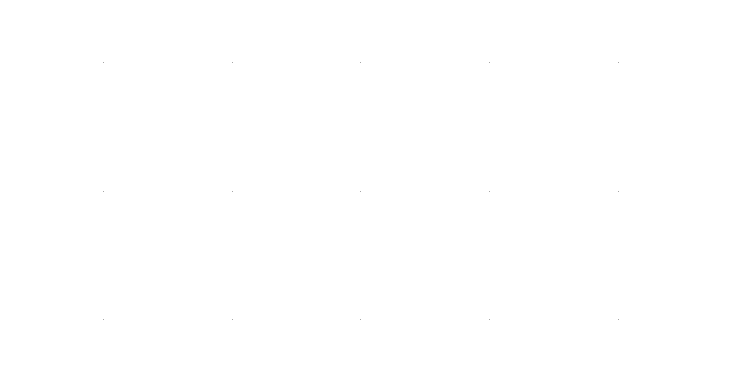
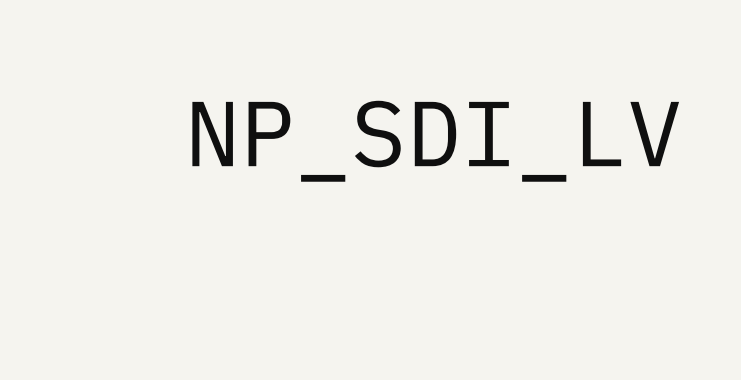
label: none -> NP_SDI_LV (435, 141)

